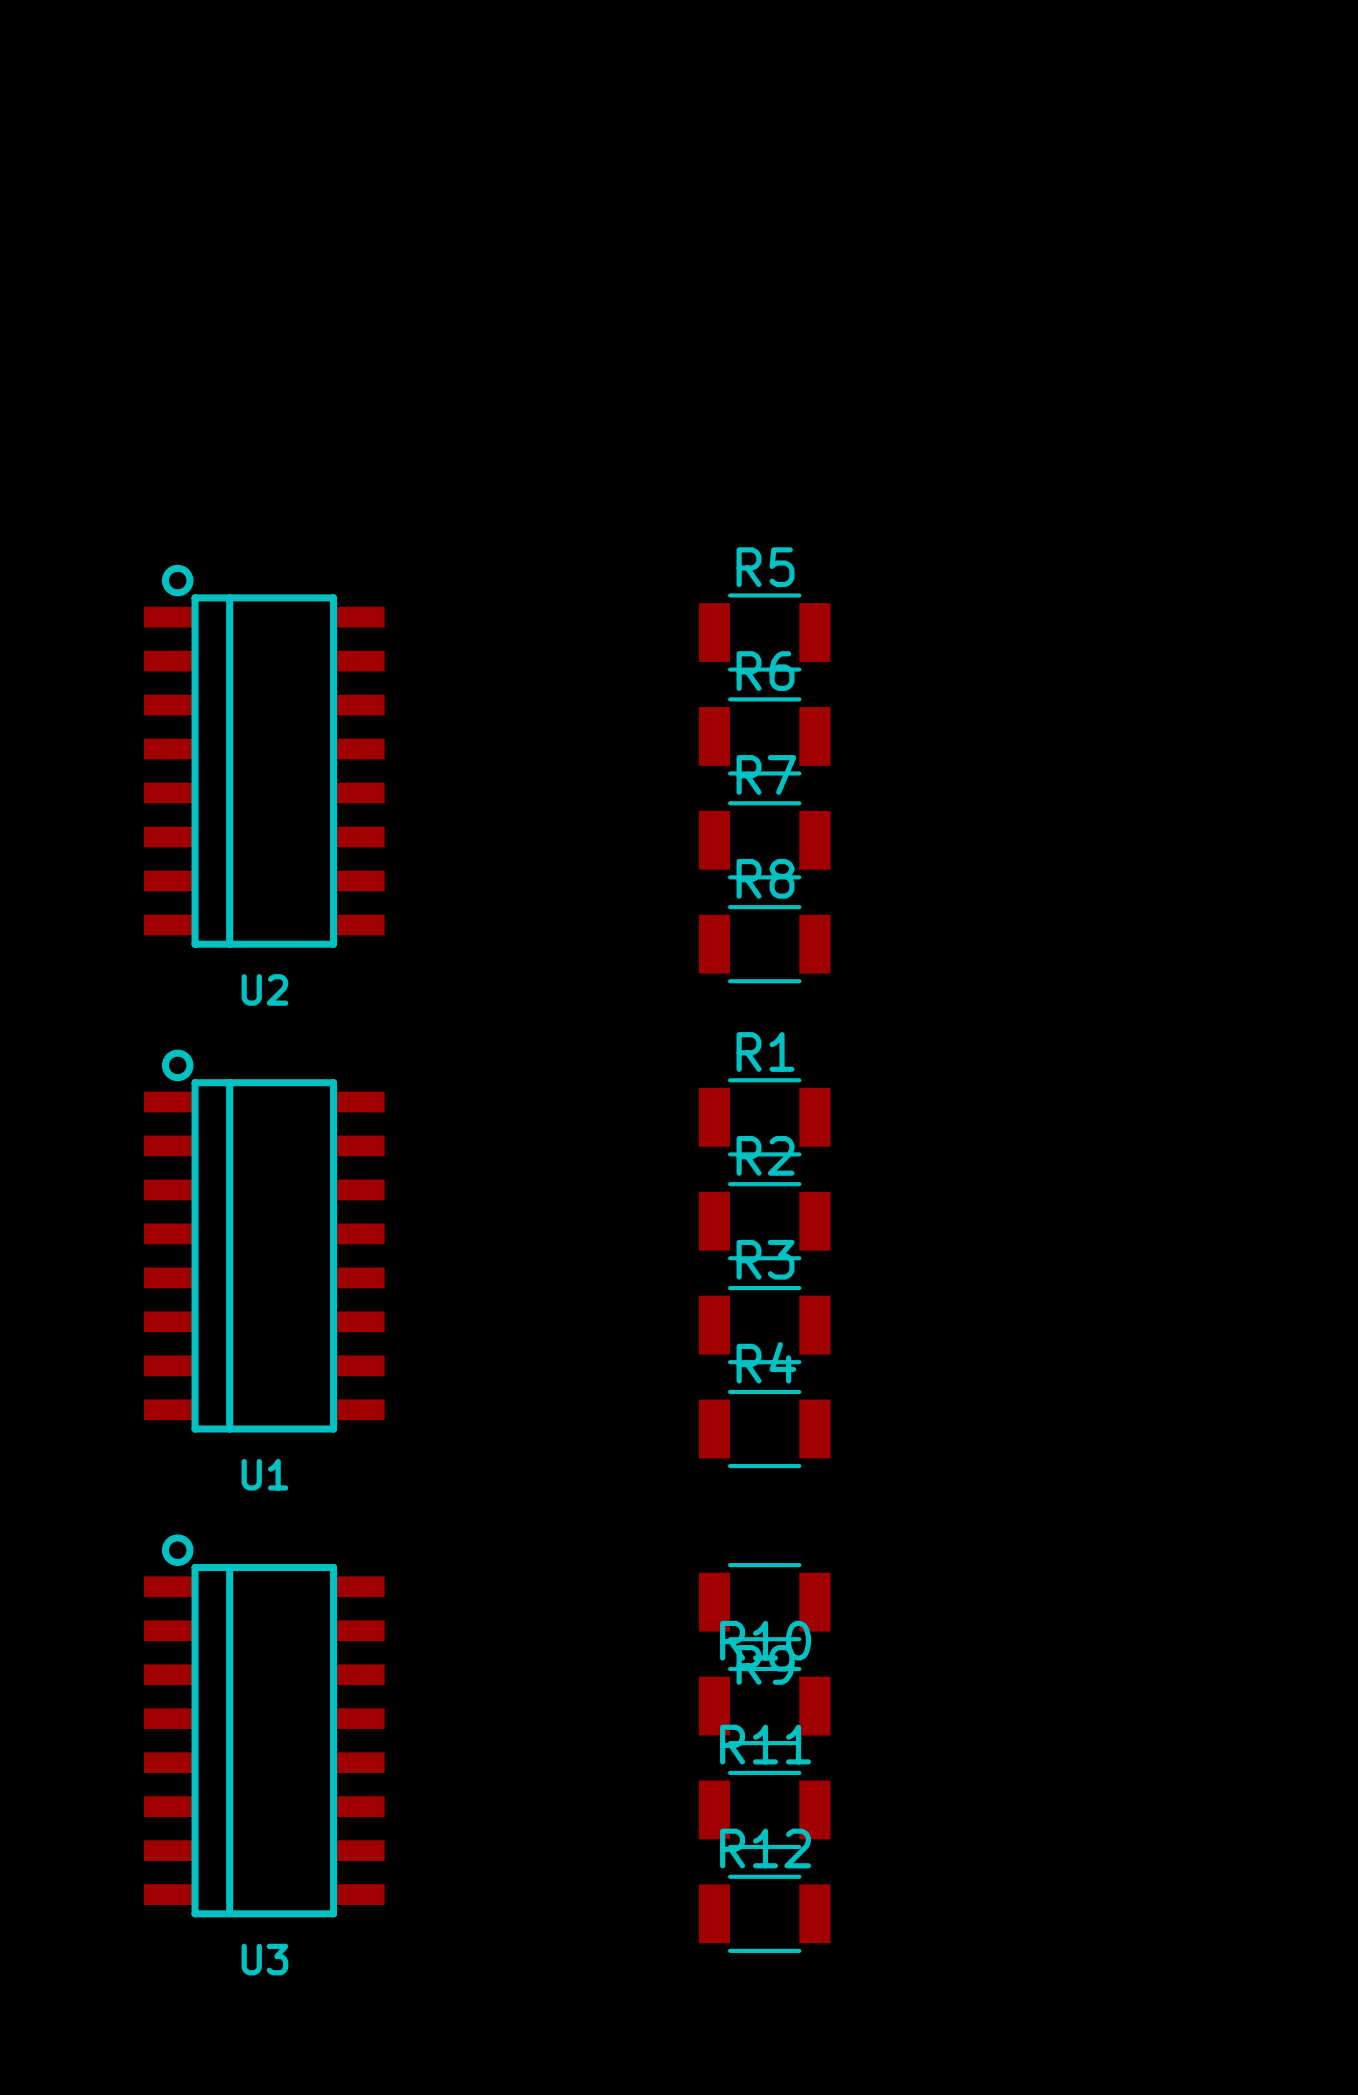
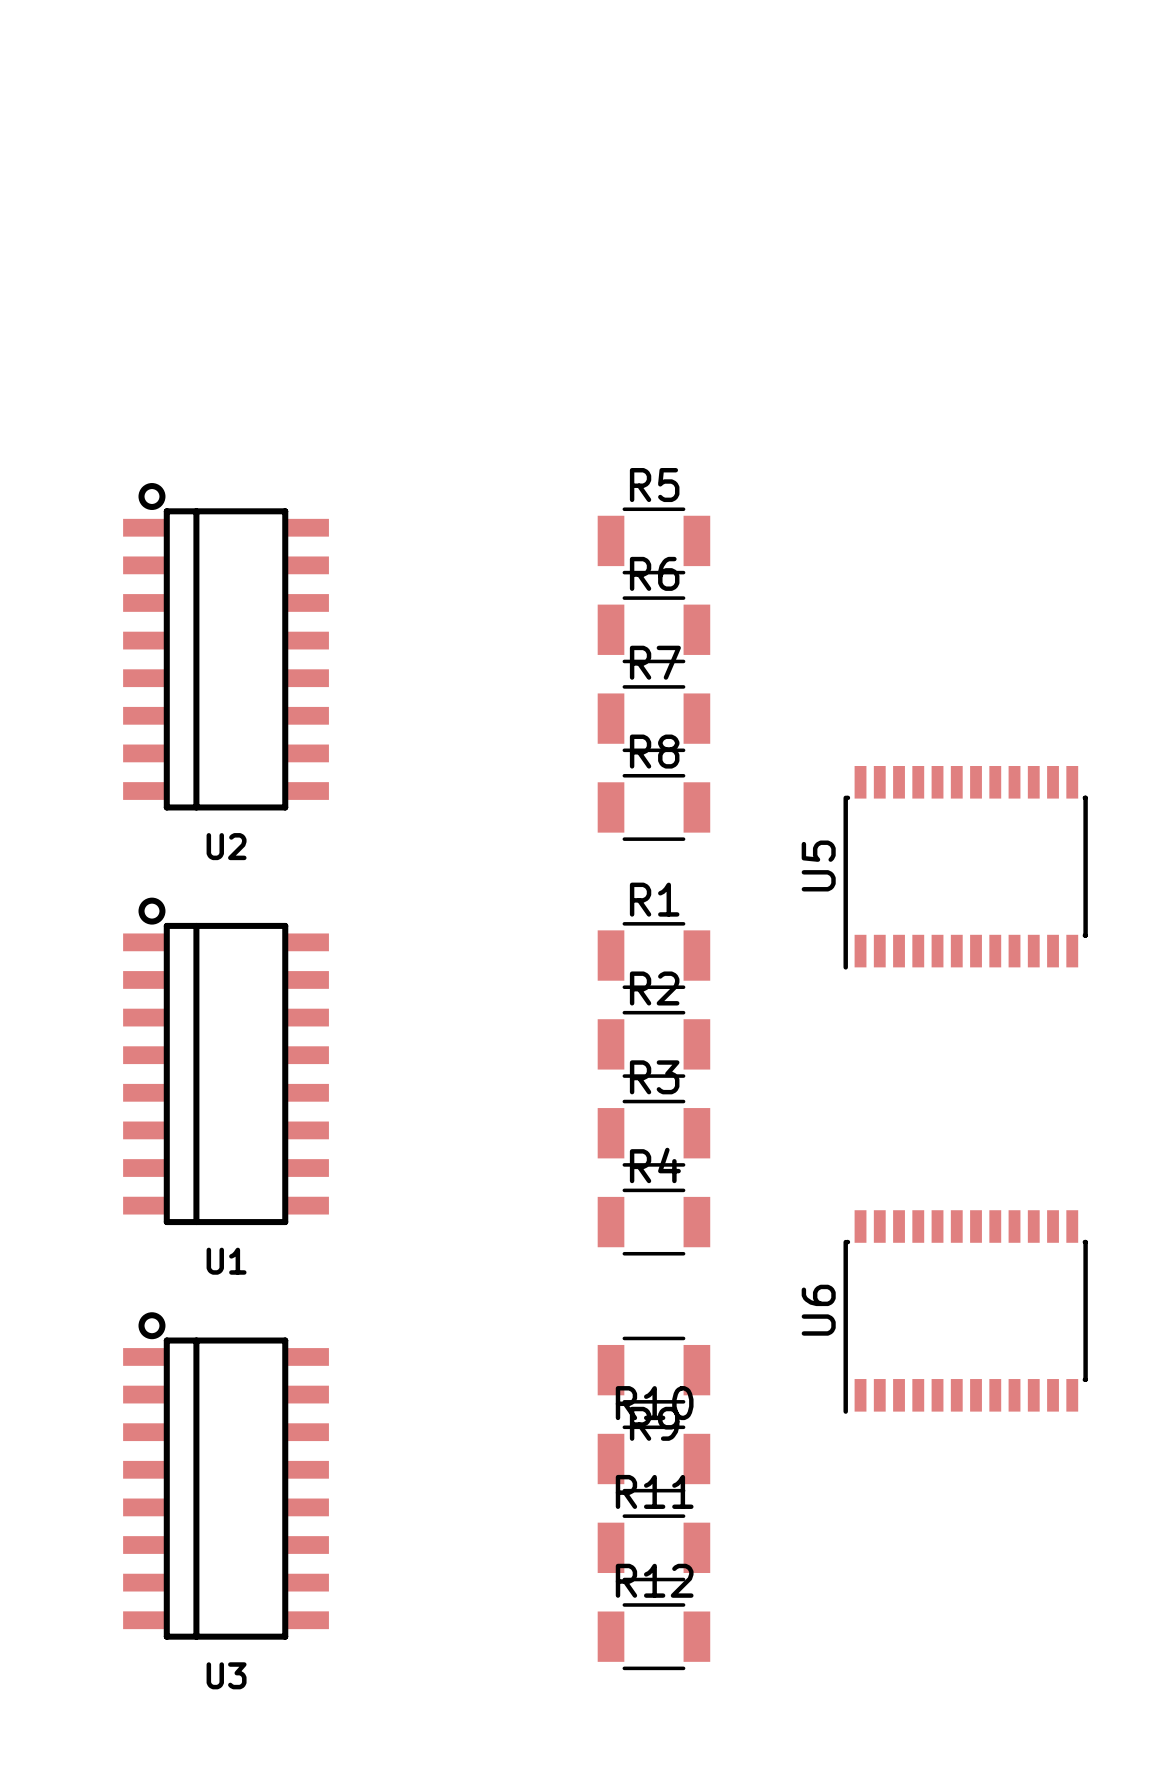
U5: none -> (965, 867)
U6: none -> (965, 1312)

